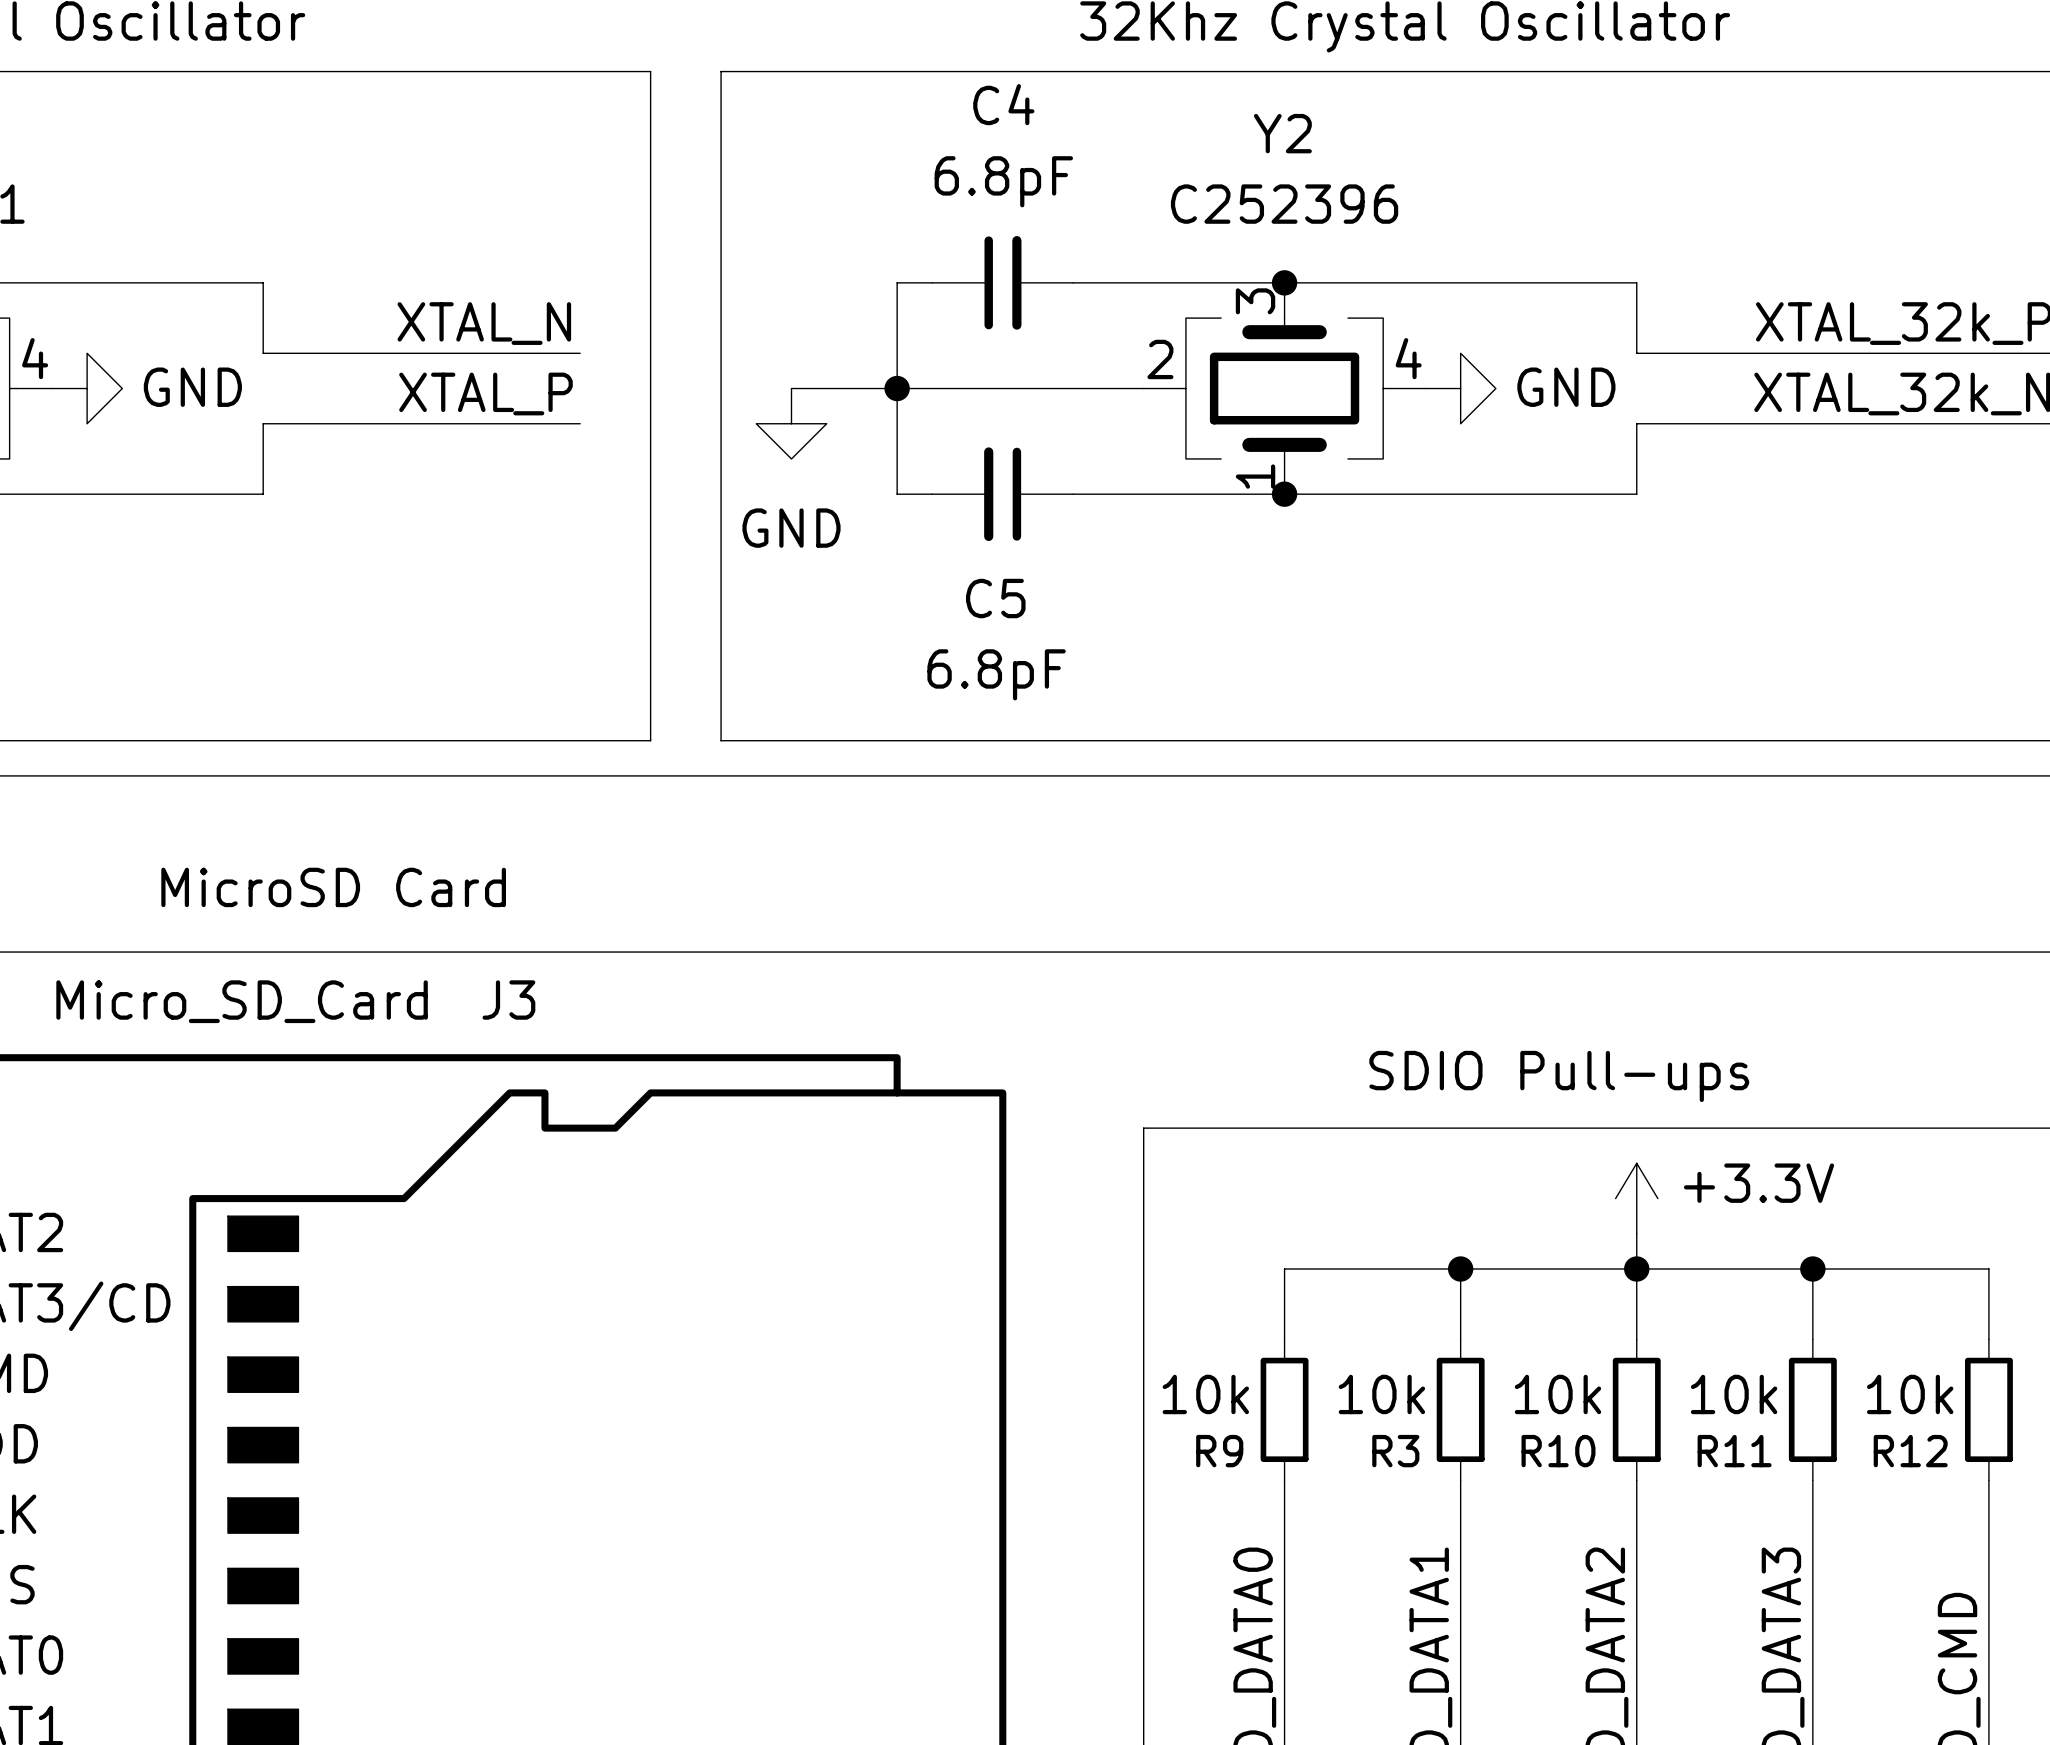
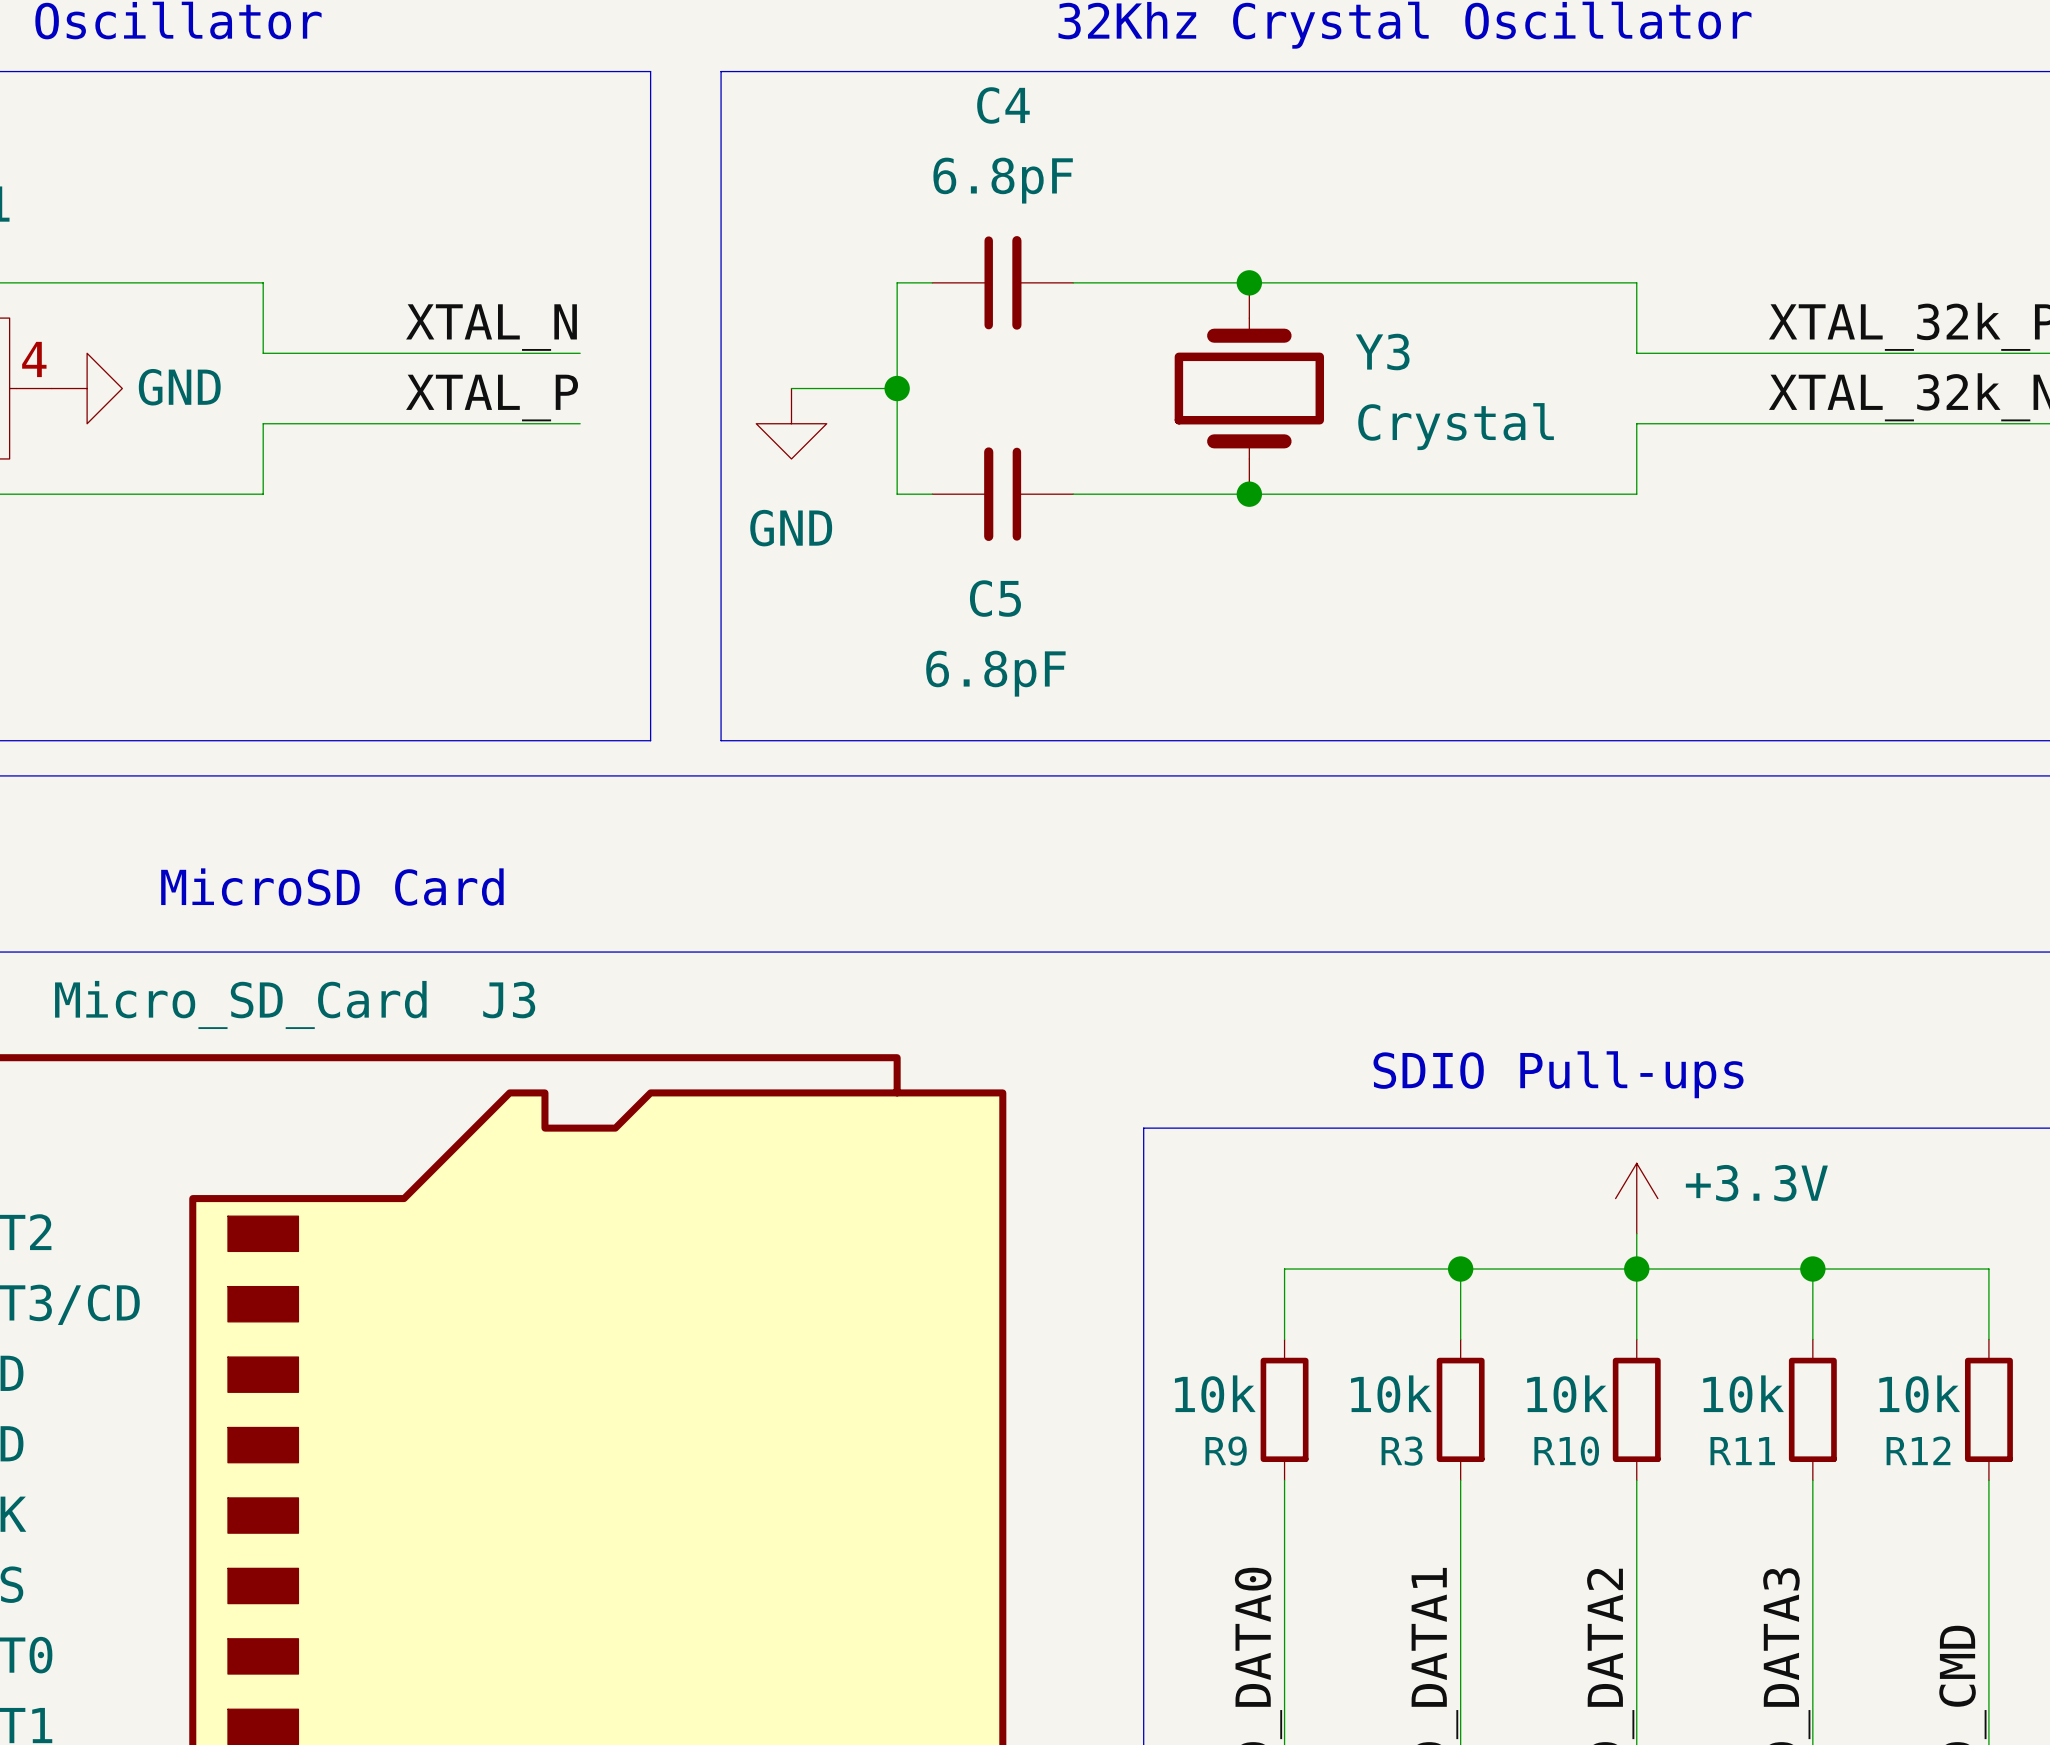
junction position: (1284, 282) -> (1249, 282)
wire: (897, 388) (1143, 388) -> none
Y3: none -> Crystal (1249, 388)
Y2: C252396 (1284, 388) -> none
power symbol: GND (1460, 388) -> none
junction position: (1284, 494) -> (1249, 494)

